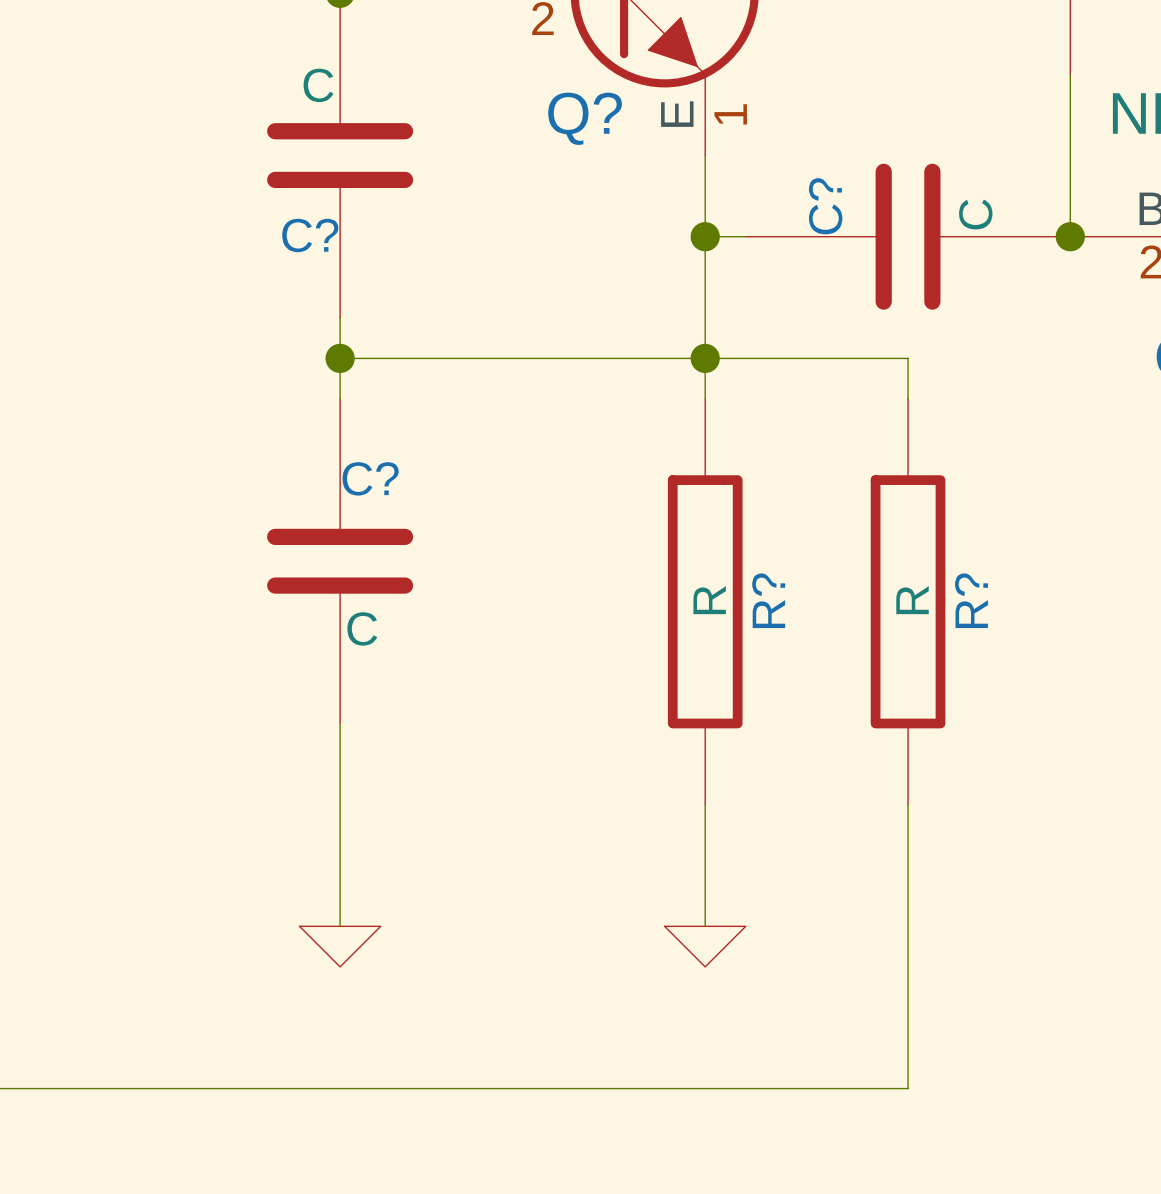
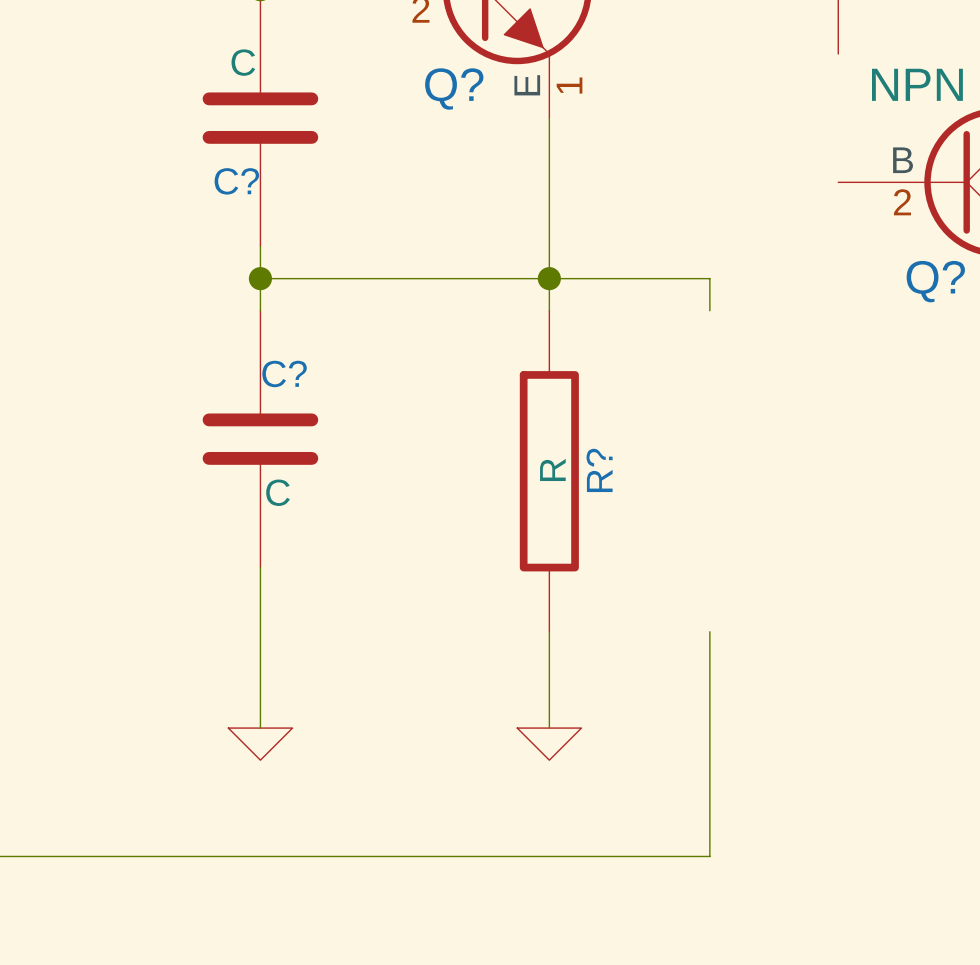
wire: (1070, 74) (1070, 236) -> none
wire: (705, 236) (745, 236) -> none
junction: (705, 236) -> none
C?: C (908, 236) -> none
junction: (1070, 236) -> none
R?: R (908, 601) -> none

